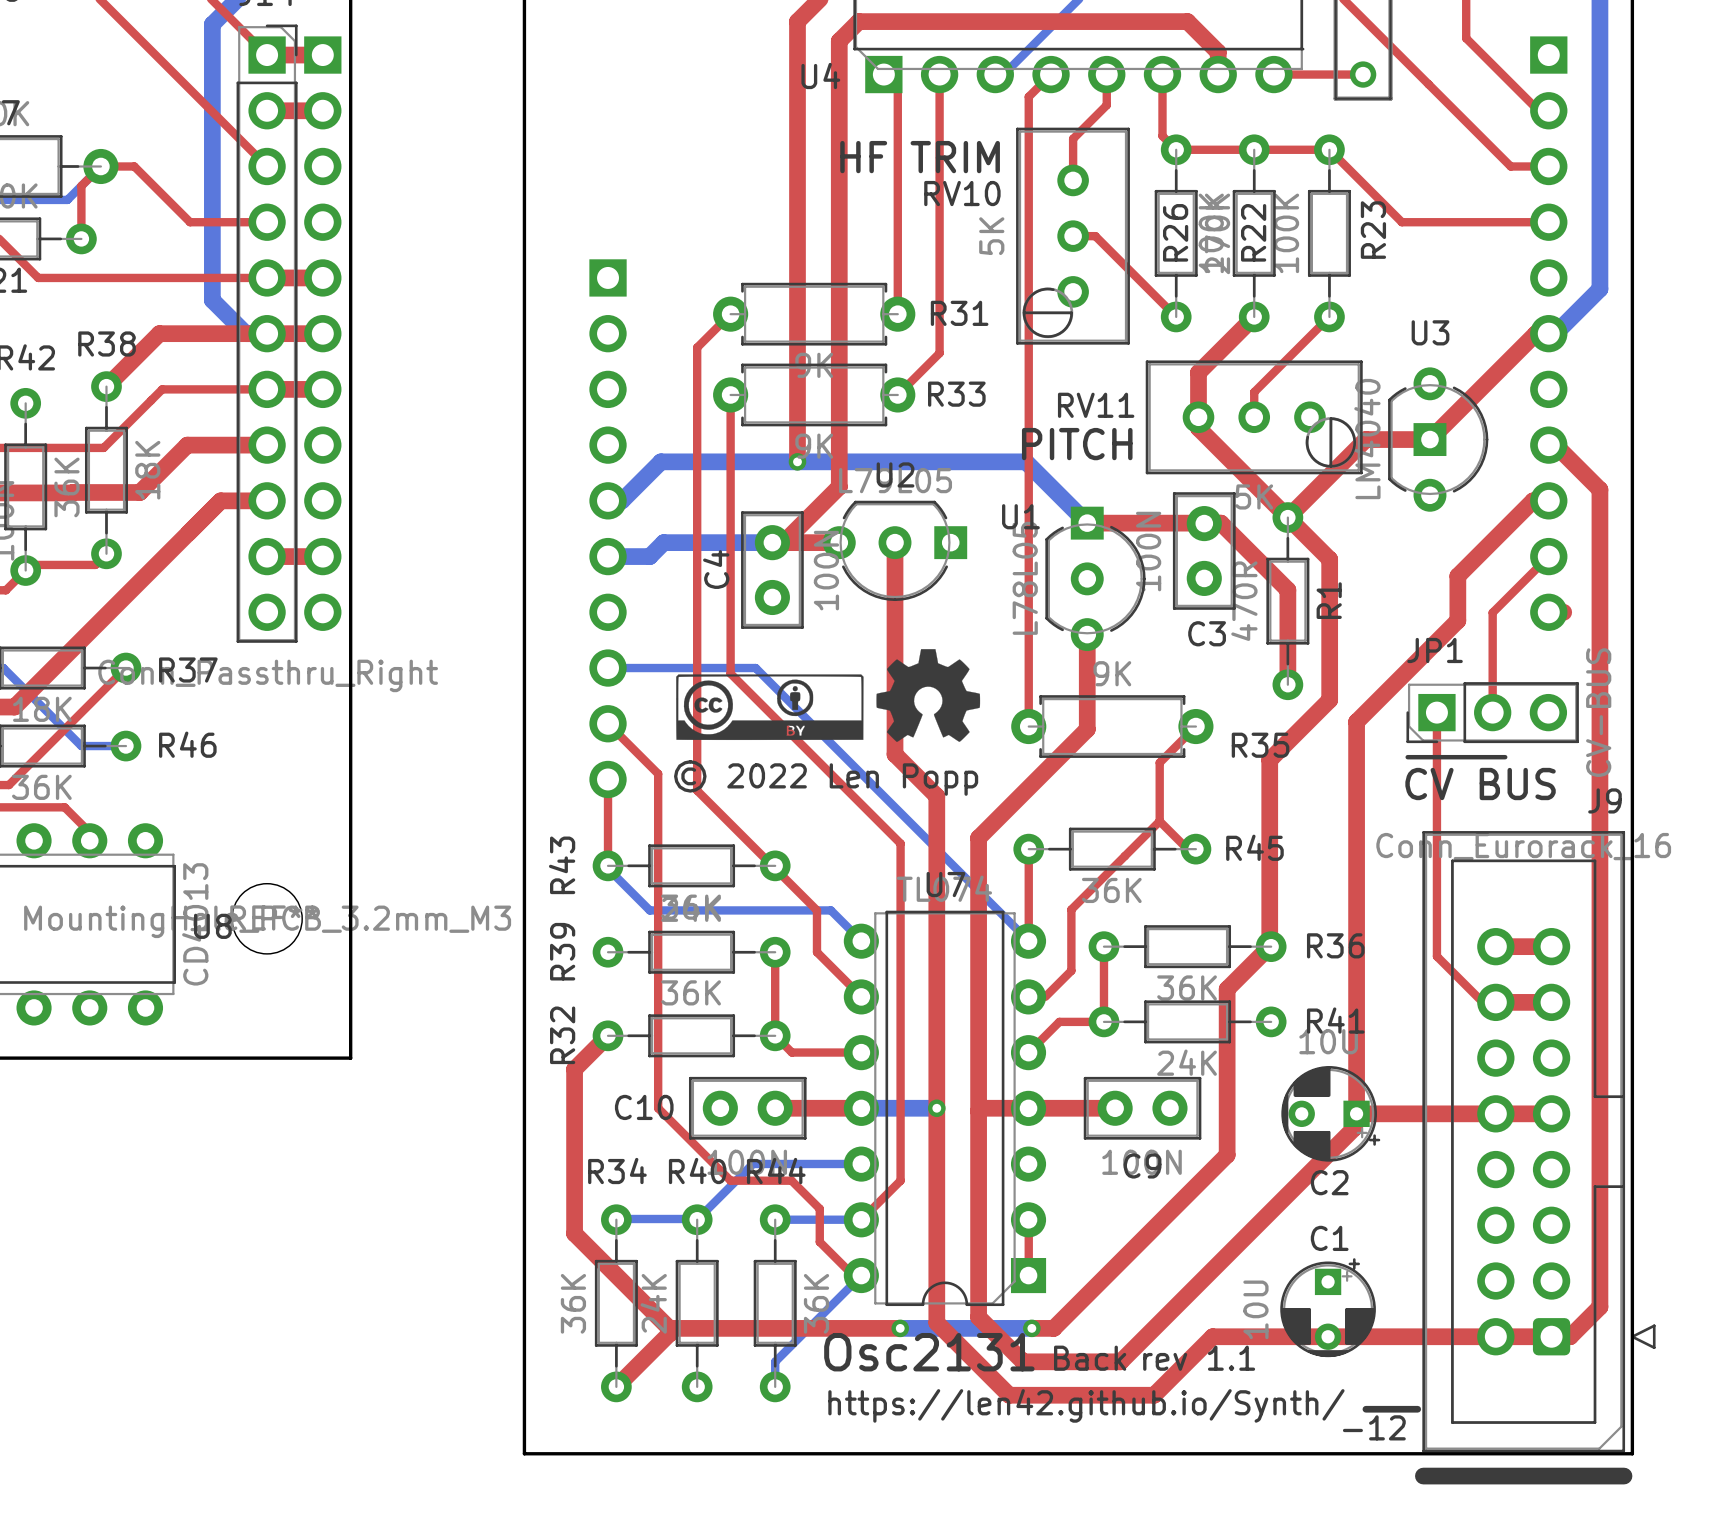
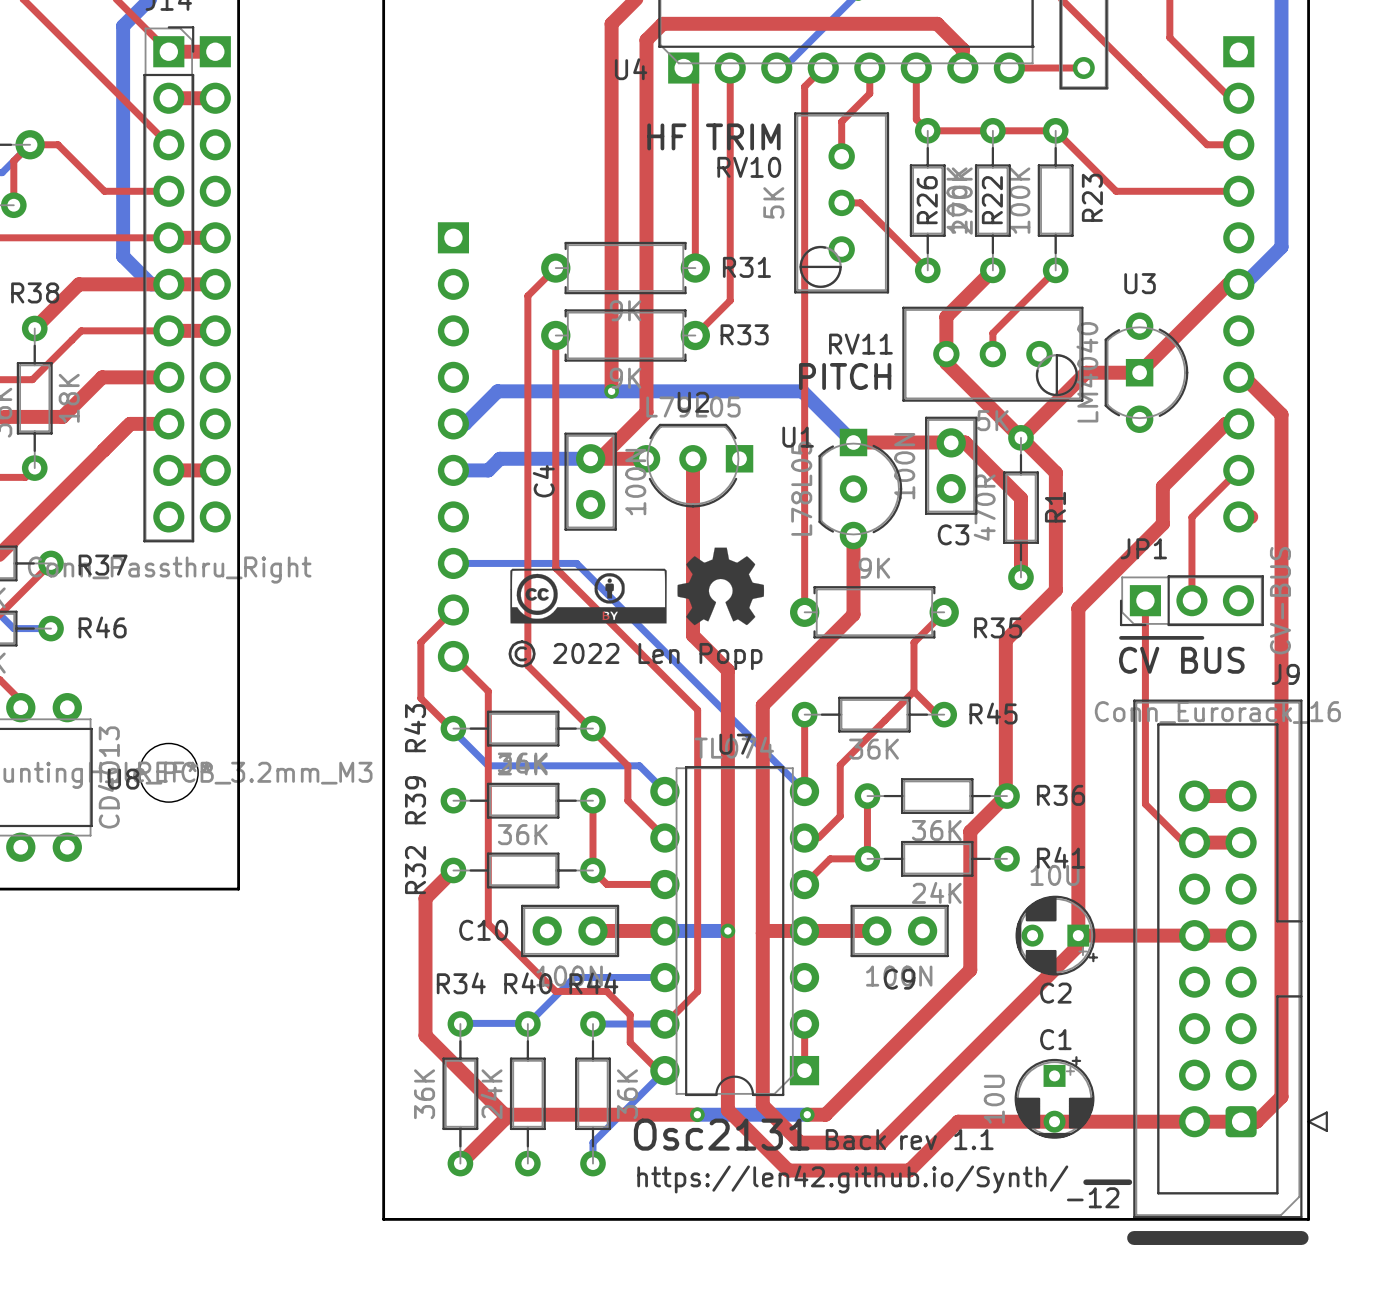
top track: (608, 723) (658, 773) (658, 1108) -> (453, 656) (488, 691) (488, 923) (495, 930)
top track: none -> (453, 609) (420, 642) (420, 698) (453, 730)
top track: (608, 779) (608, 865) -> none

